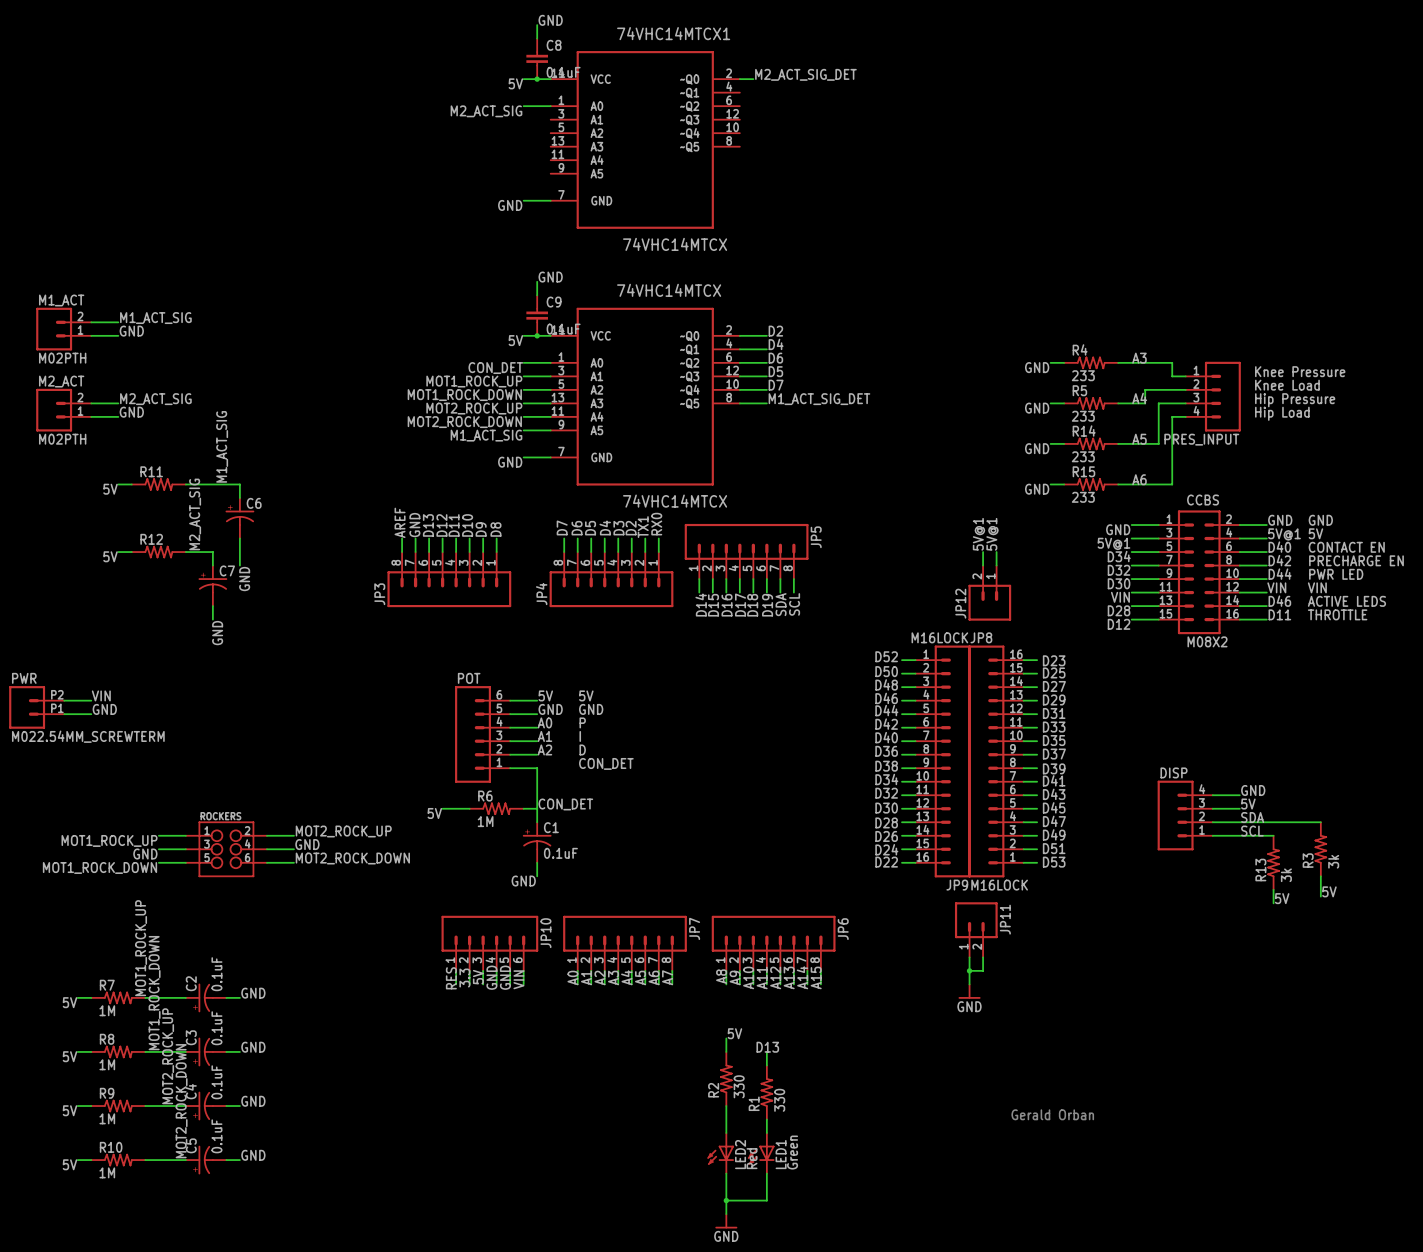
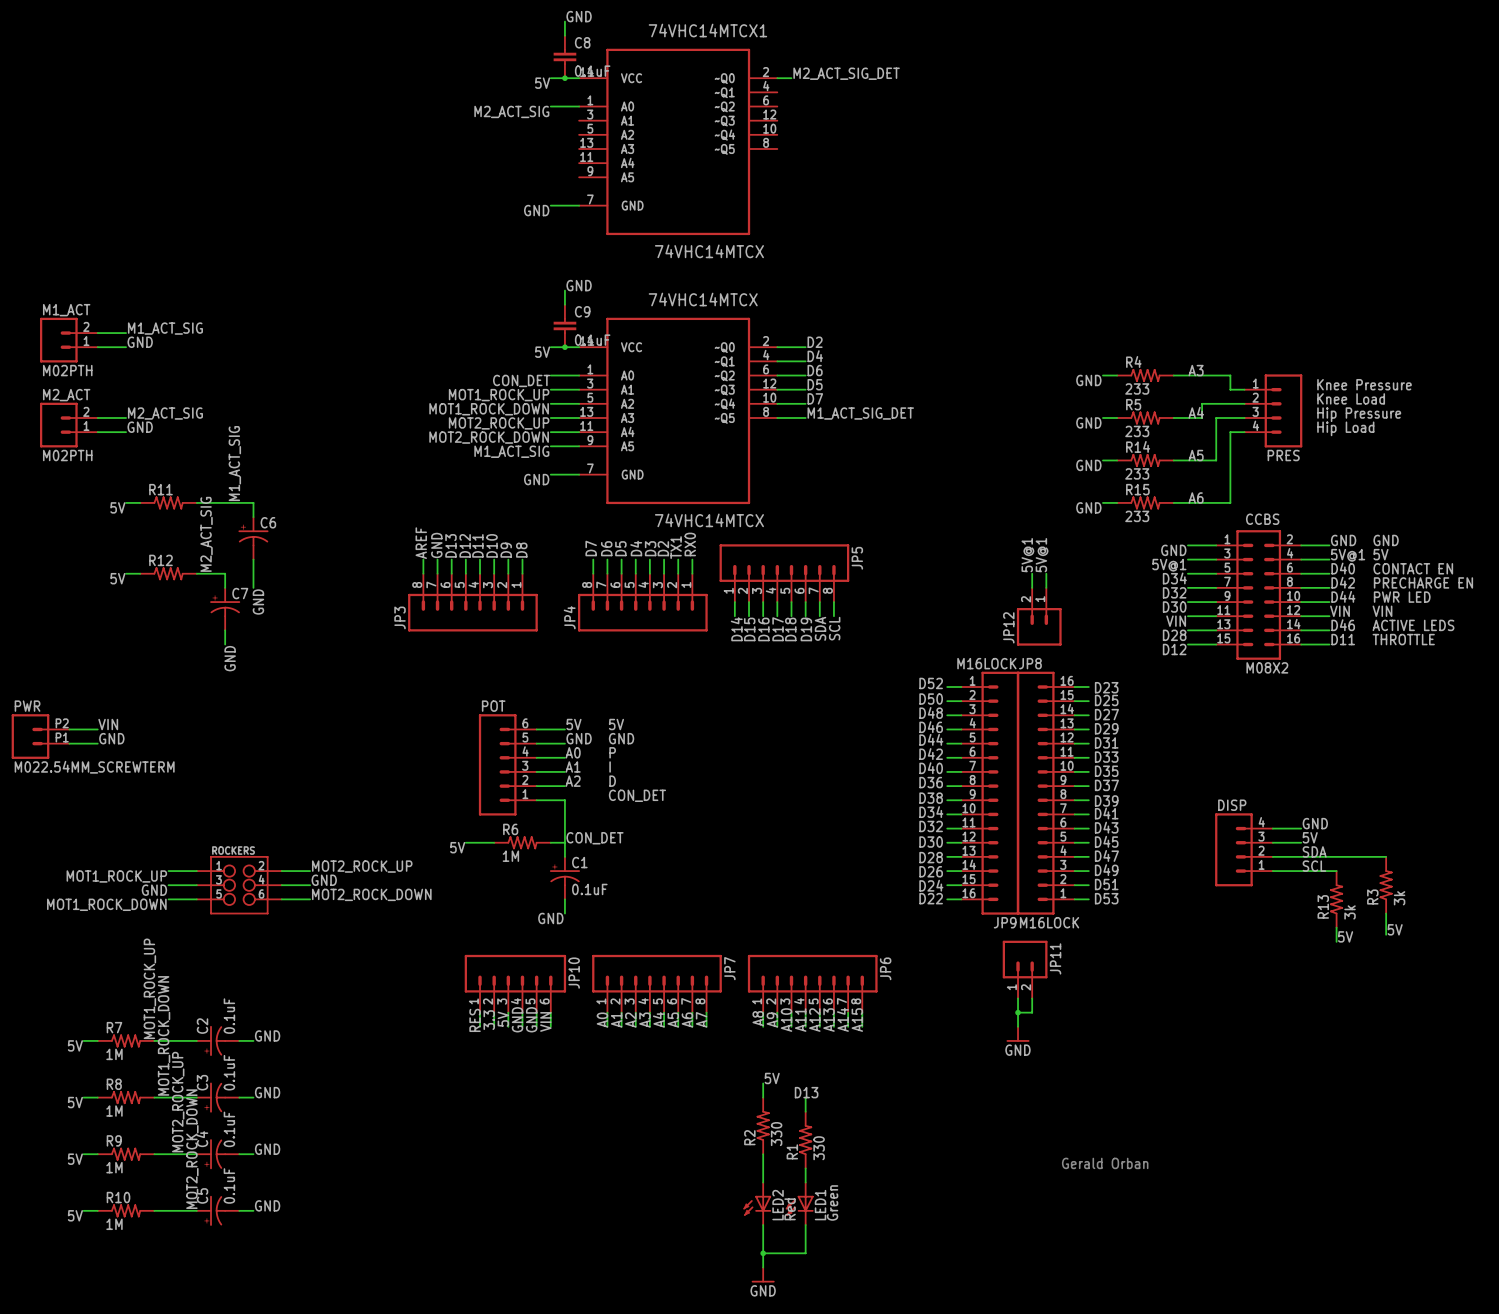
PRES_INPUT name: PRES_INPUT (1201, 439) -> PRES (1283, 455)

